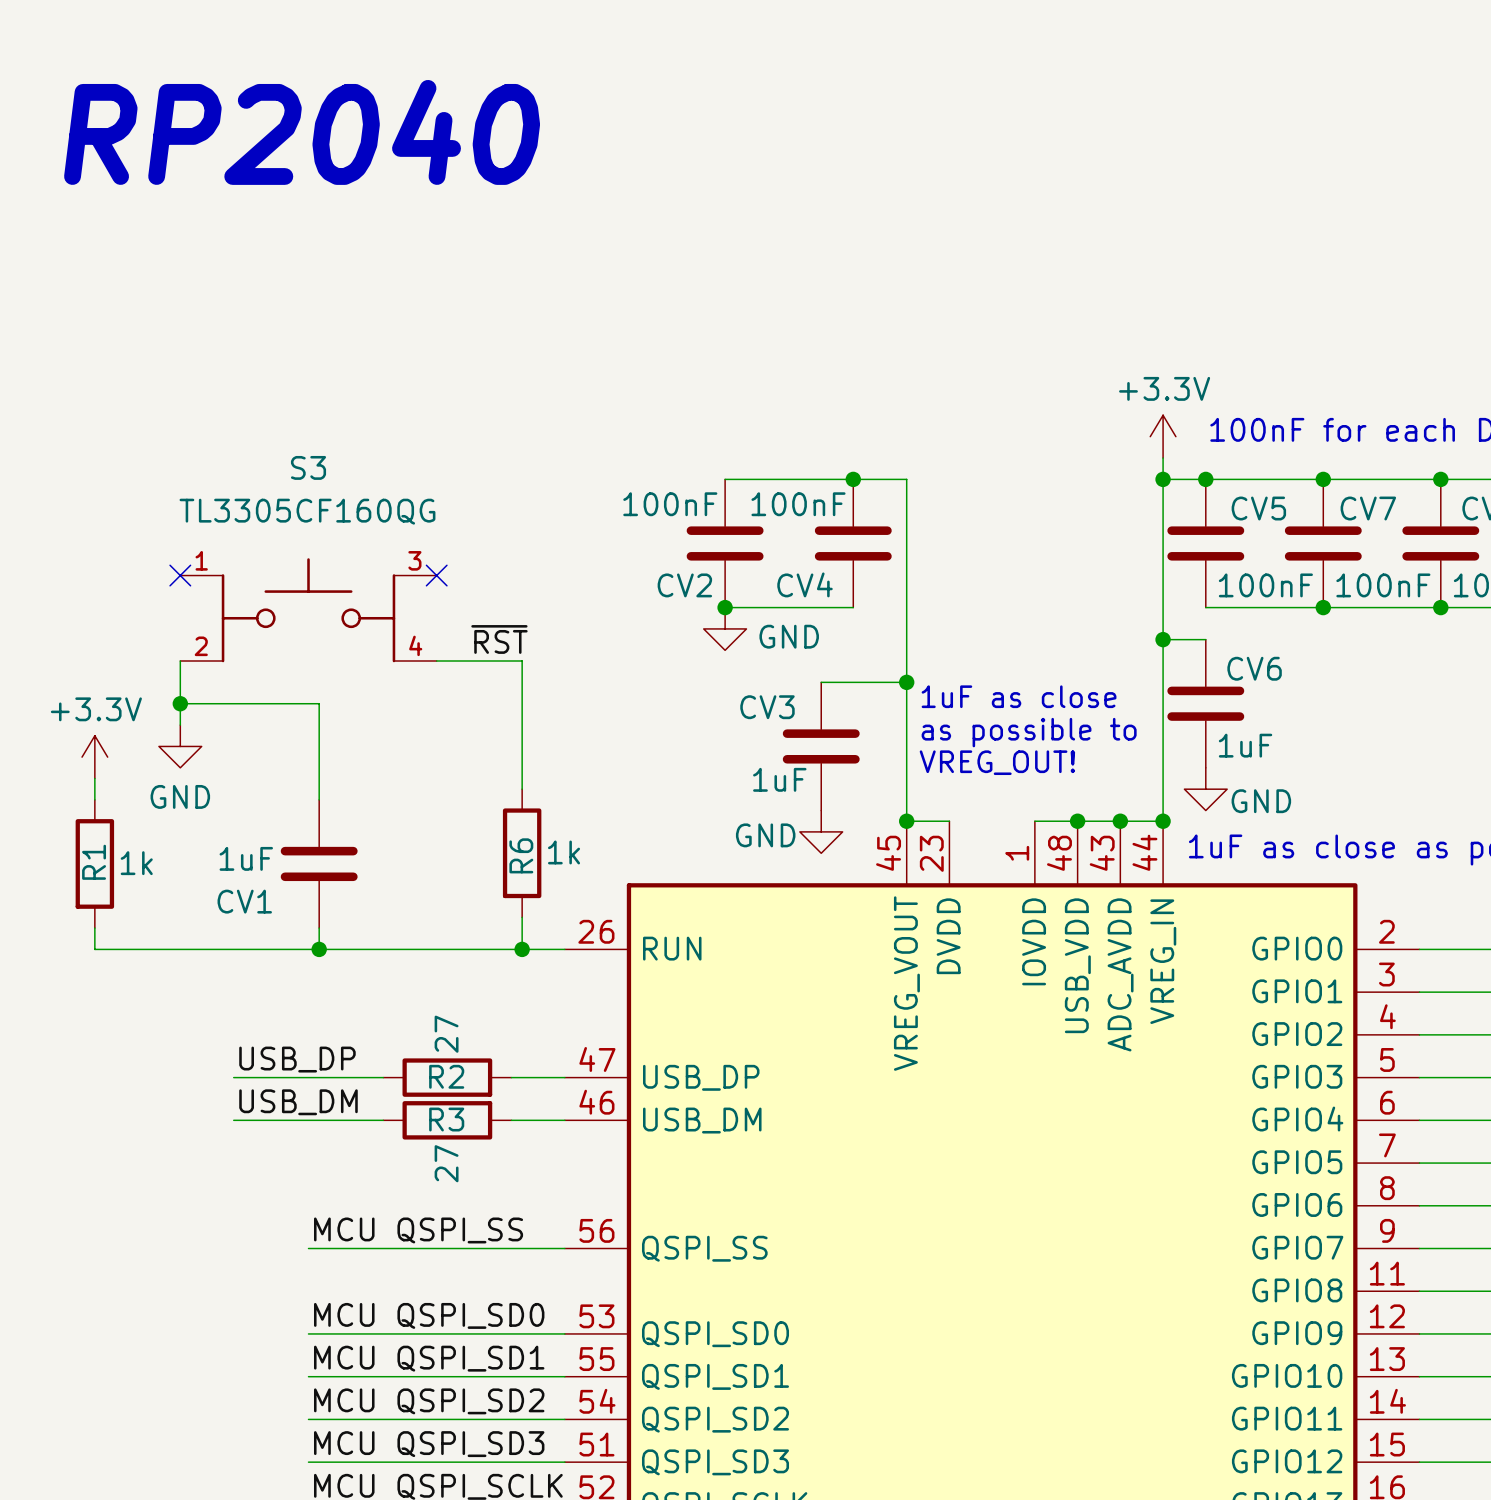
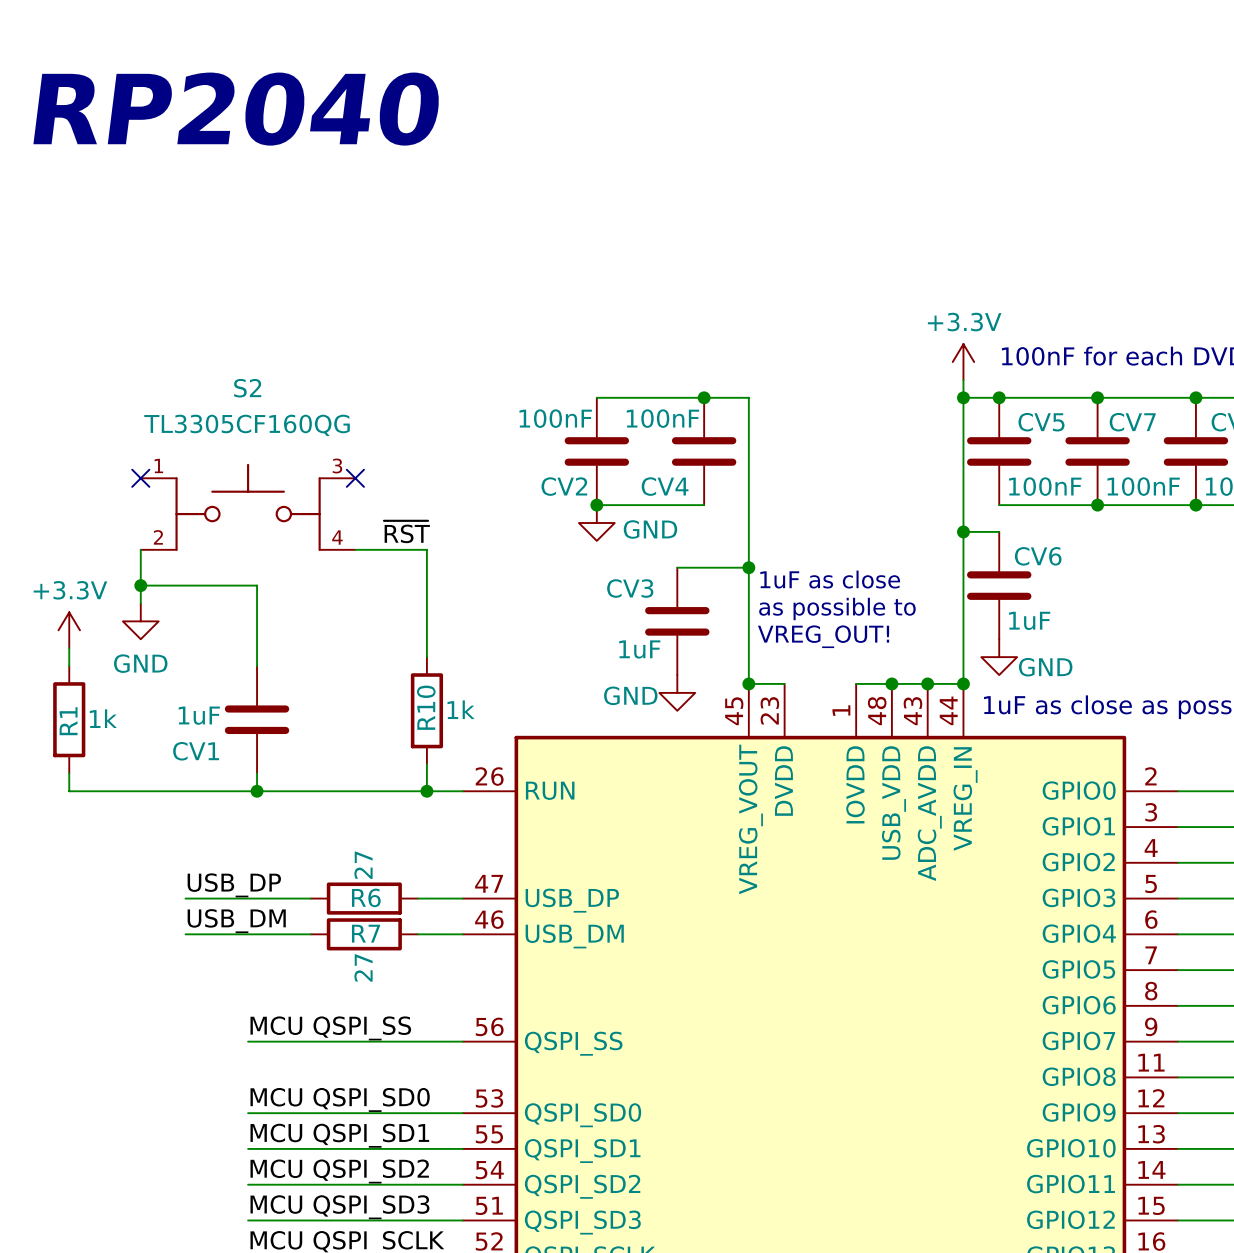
S3 name: S3 (308, 467) -> S2 (247, 388)
R6 name: R6 (521, 855) -> R10 (426, 707)
R2 name: R2 (446, 1076) -> R6 (366, 897)
R3 name: R3 (446, 1119) -> R7 (366, 933)

